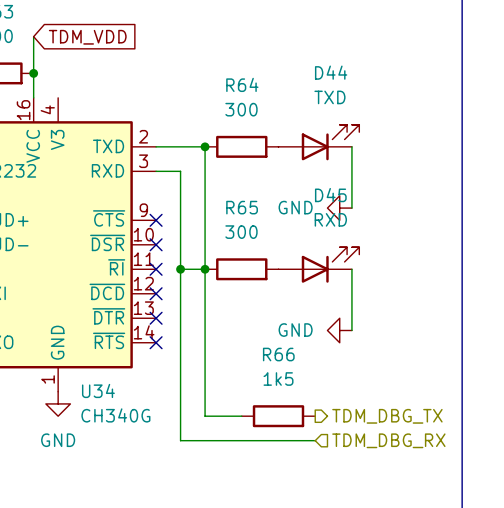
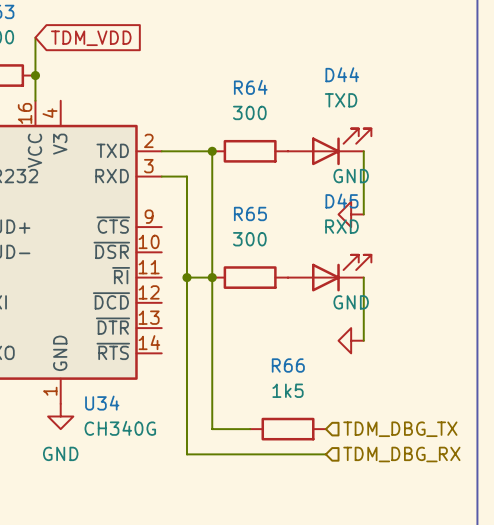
power symbol text position: GND (295, 207) -> GND (351, 176)
no-connect mark: (156, 220) -> none
no-connect mark: (156, 244) -> none
no-connect mark: (156, 269) -> none
no-connect mark: (156, 293) -> none
no-connect mark: (156, 318) -> none
power symbol text position: GND (295, 330) -> GND (351, 302)
no-connect mark: (156, 342) -> none
hierarchical label shape: output (387, 416) -> input (400, 429)

